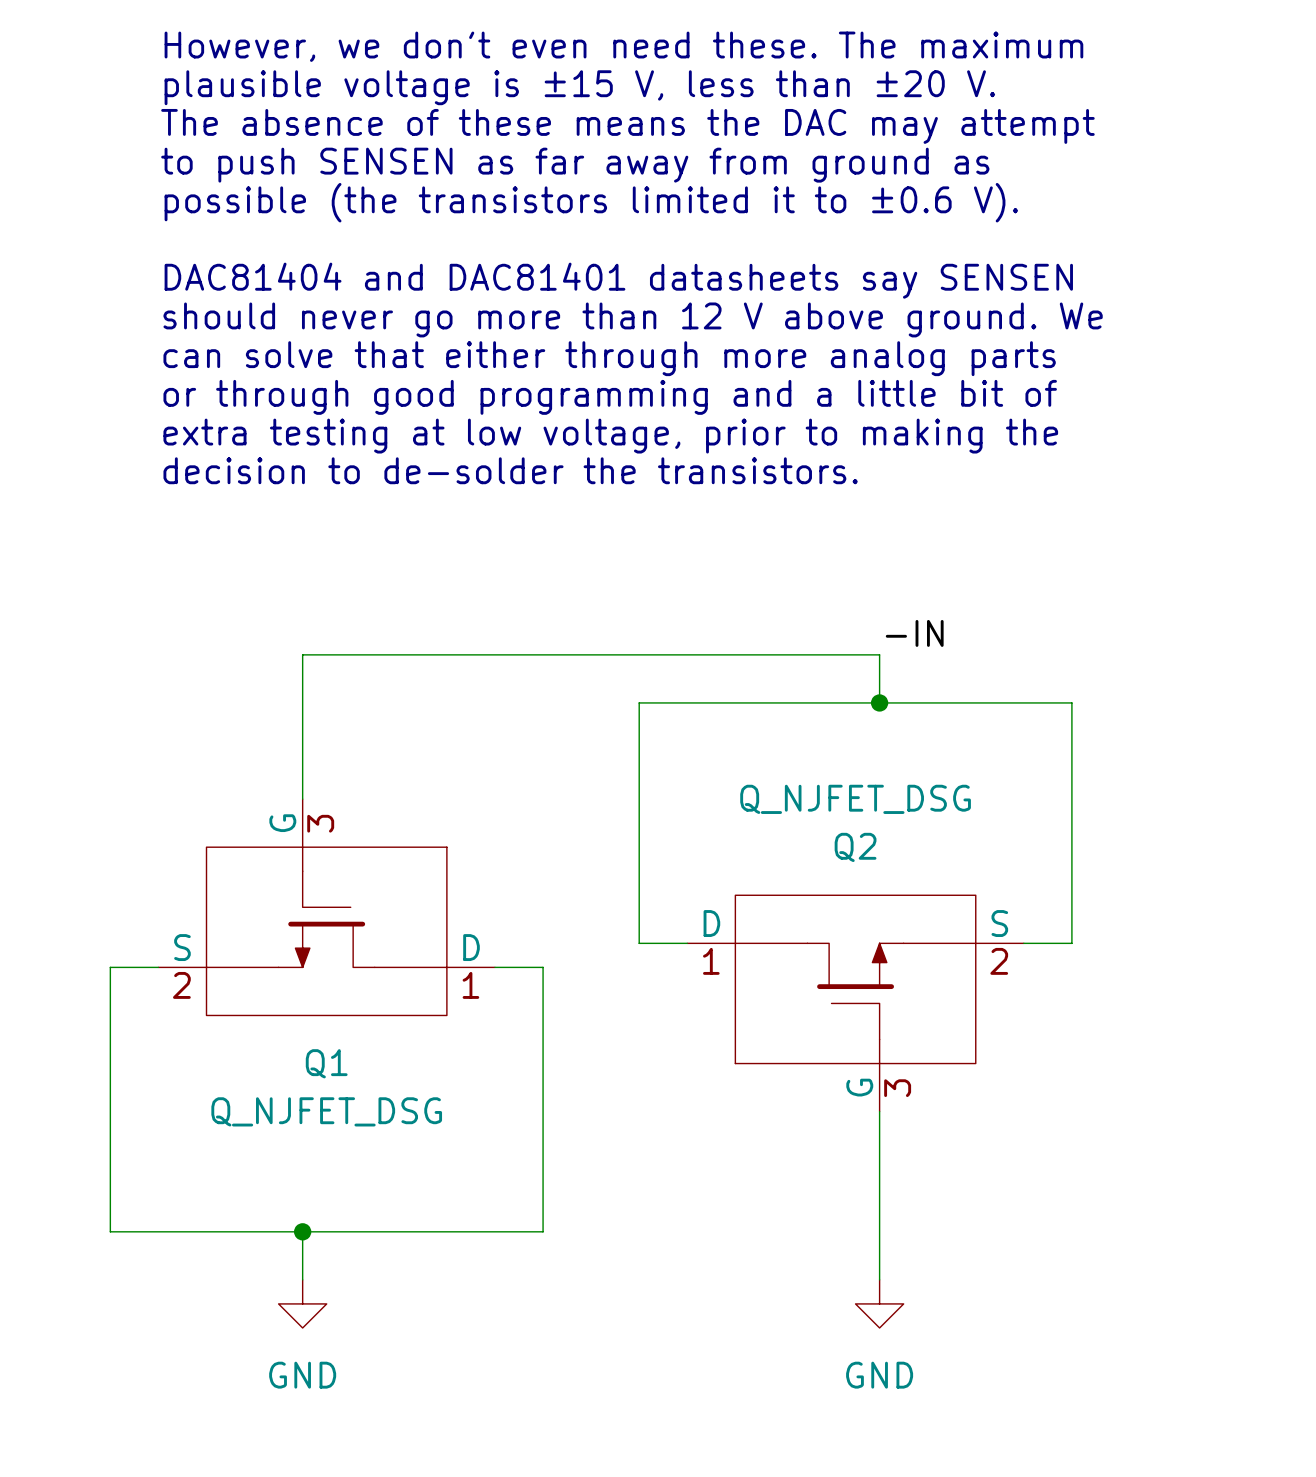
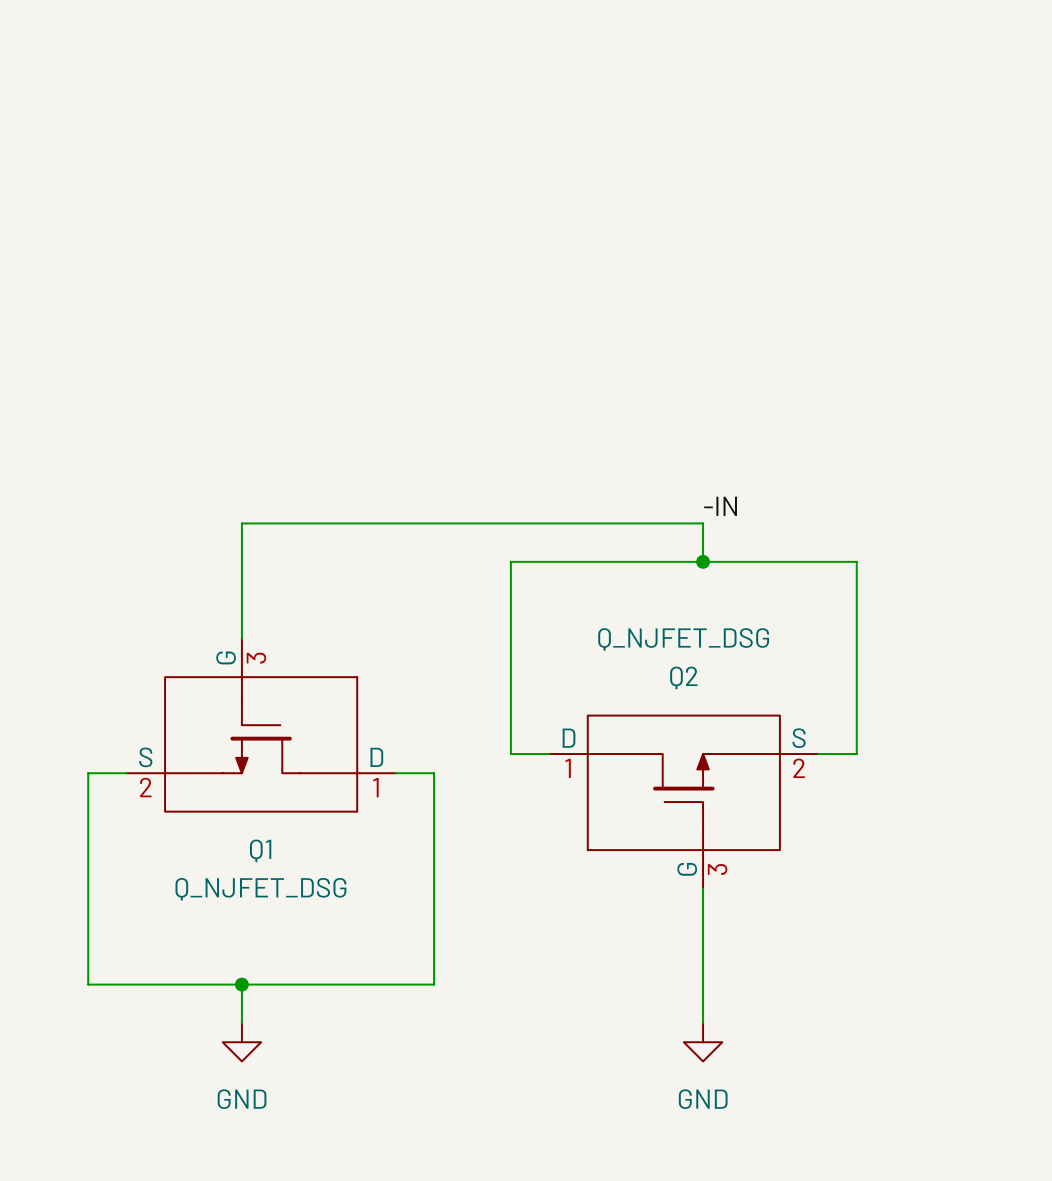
text: However, we don't even need these. The maximum (623, 46) -> none
text: plausible voltage is ±15 V, less than ±20 V. (579, 87) -> none
text: The absence of these means the DAC may attempt (627, 126) -> none
text: to push SENSEN as far away from ground as (575, 165) -> none
text: possible (the transistors limited it to ±0.6 V). (591, 202) -> none
text: DAC81404 and DAC81401 datasheets say SENSEN (618, 280) -> none
text: should never go more than 12 V above ground. We (633, 319) -> none
text: can solve that either through more analog parts (609, 358) -> none
text: or through good programming and a little bit of (610, 397) -> none
text: extra testing at low voltage, prior to making the (610, 436) -> none
text: decision to de-solder the transistors. (510, 470) -> none

